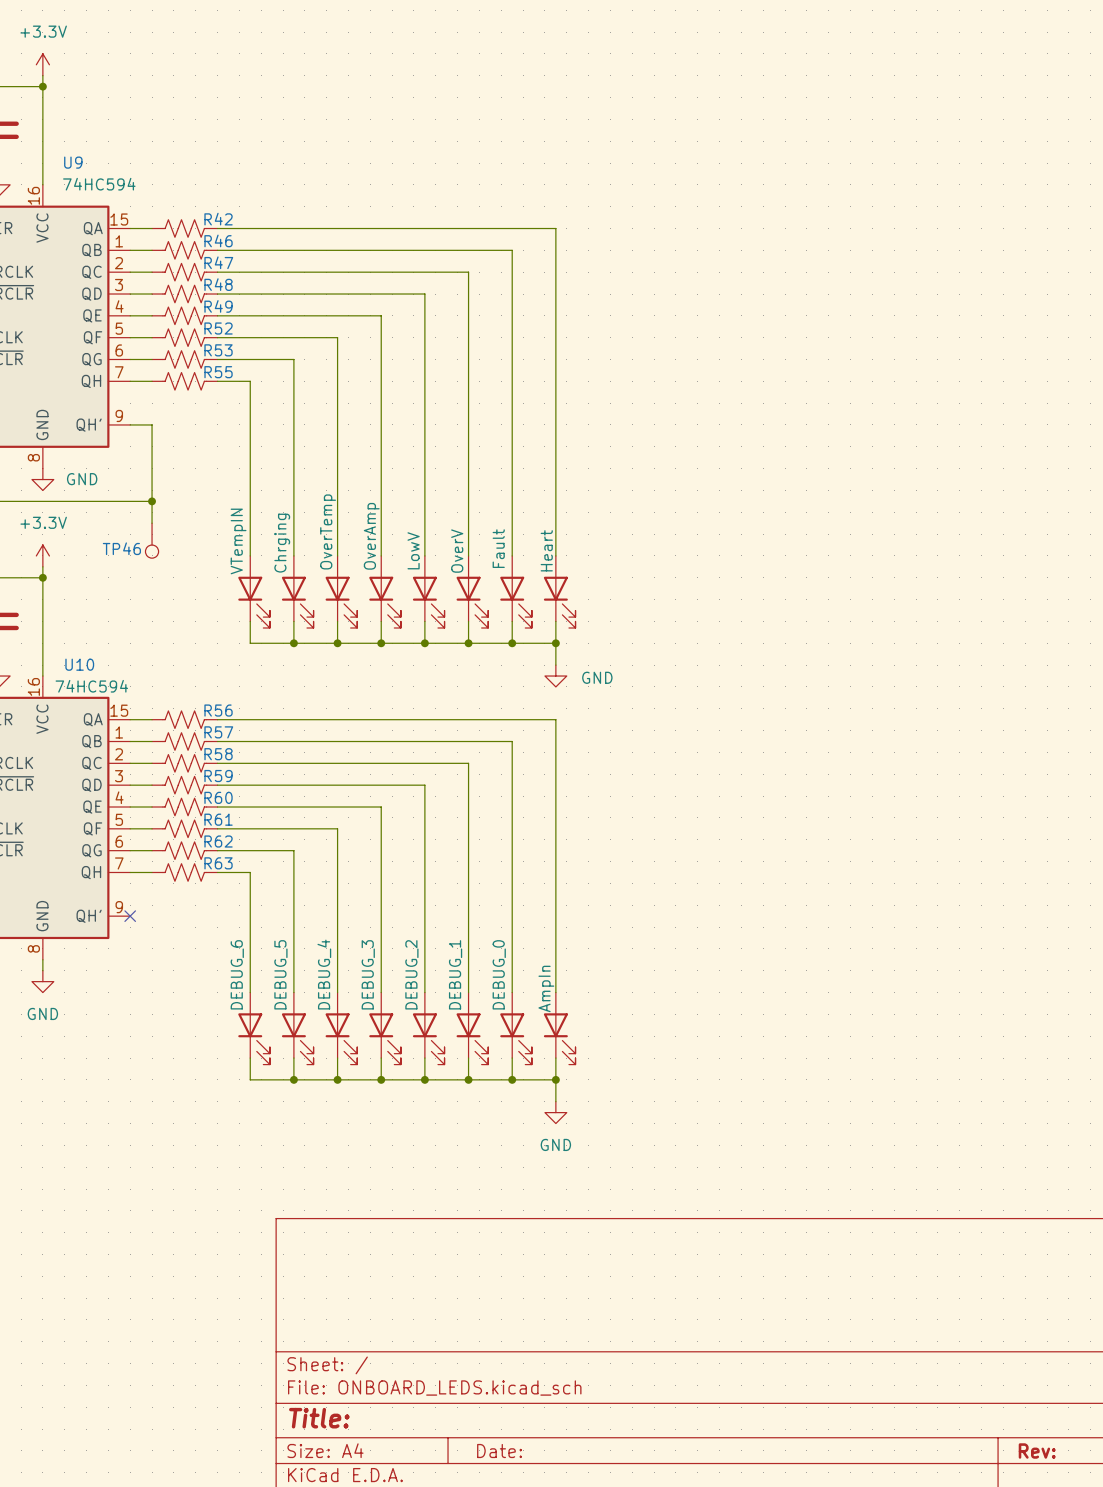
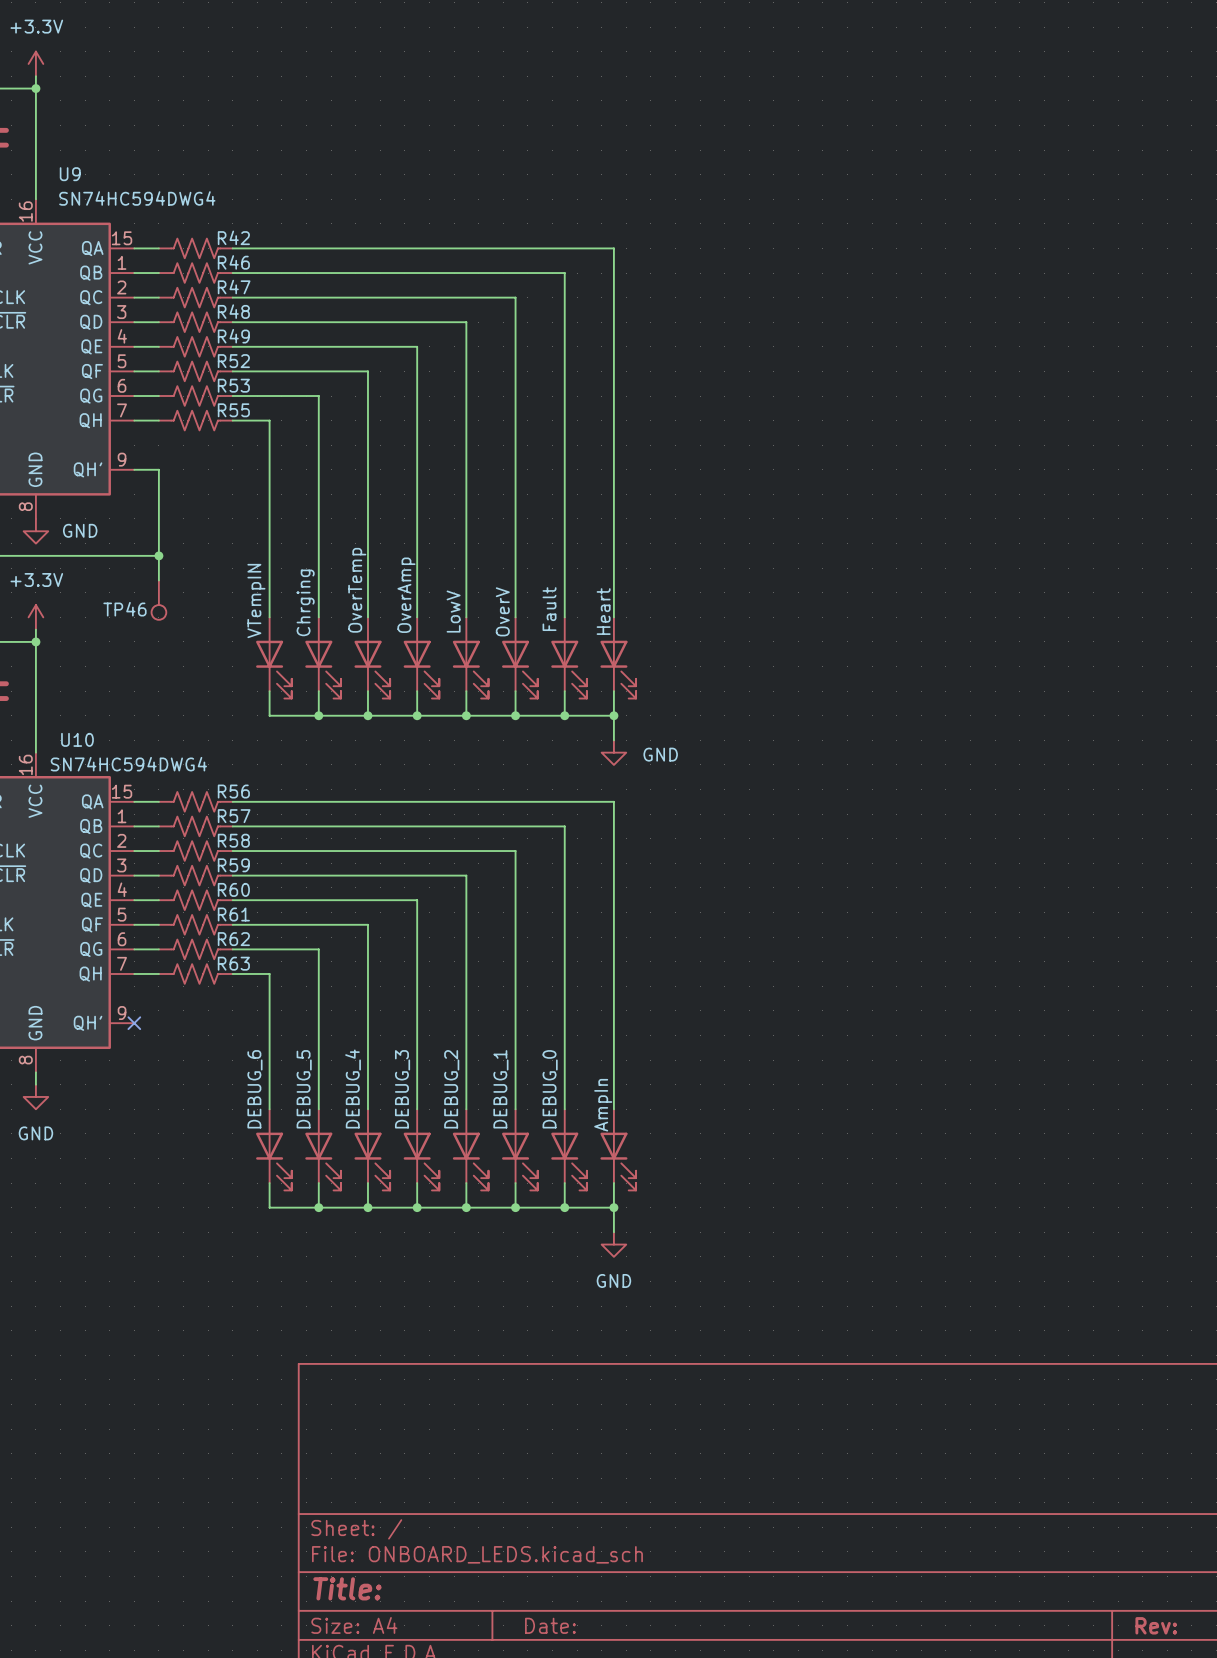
U9 value: 74HC594 (99, 184) -> SN74HC594DWG4 (137, 198)
U10 value: 74HC594 (91, 686) -> SN74HC594DWG4 (128, 764)

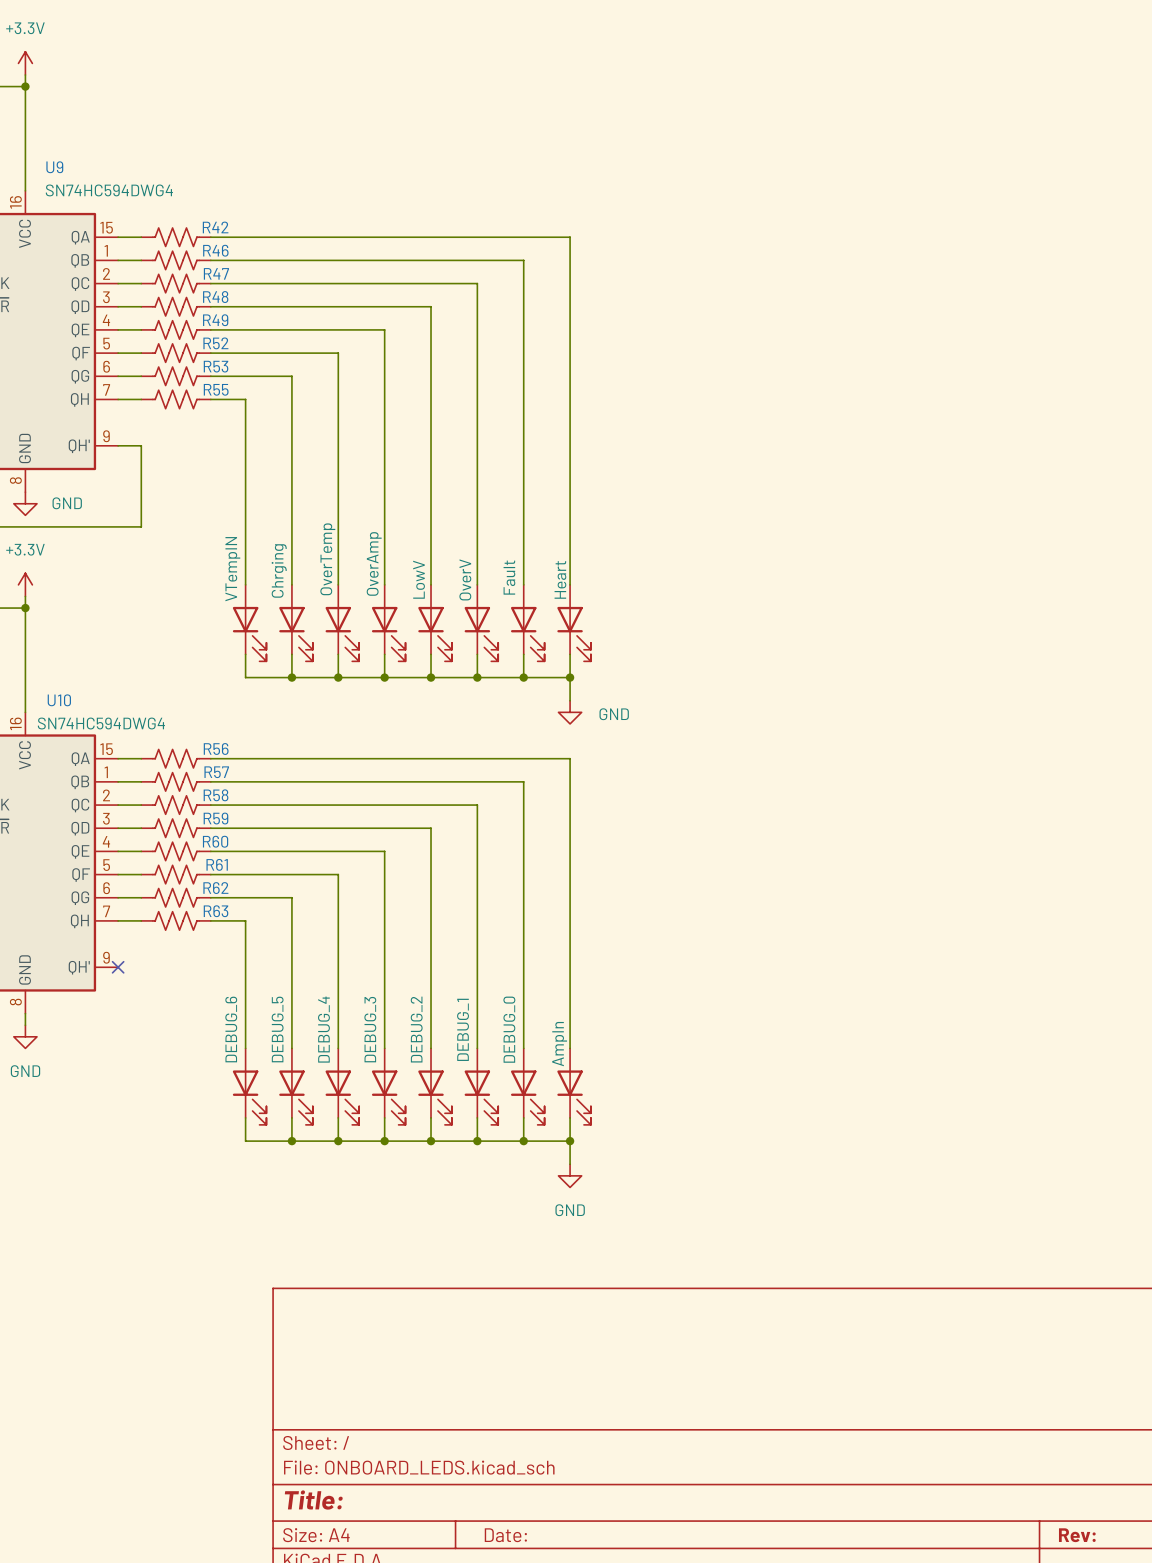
wire: (158, 555) (158, 580) -> none
junction: (158, 555) -> none
TP46: (158, 600) -> none

